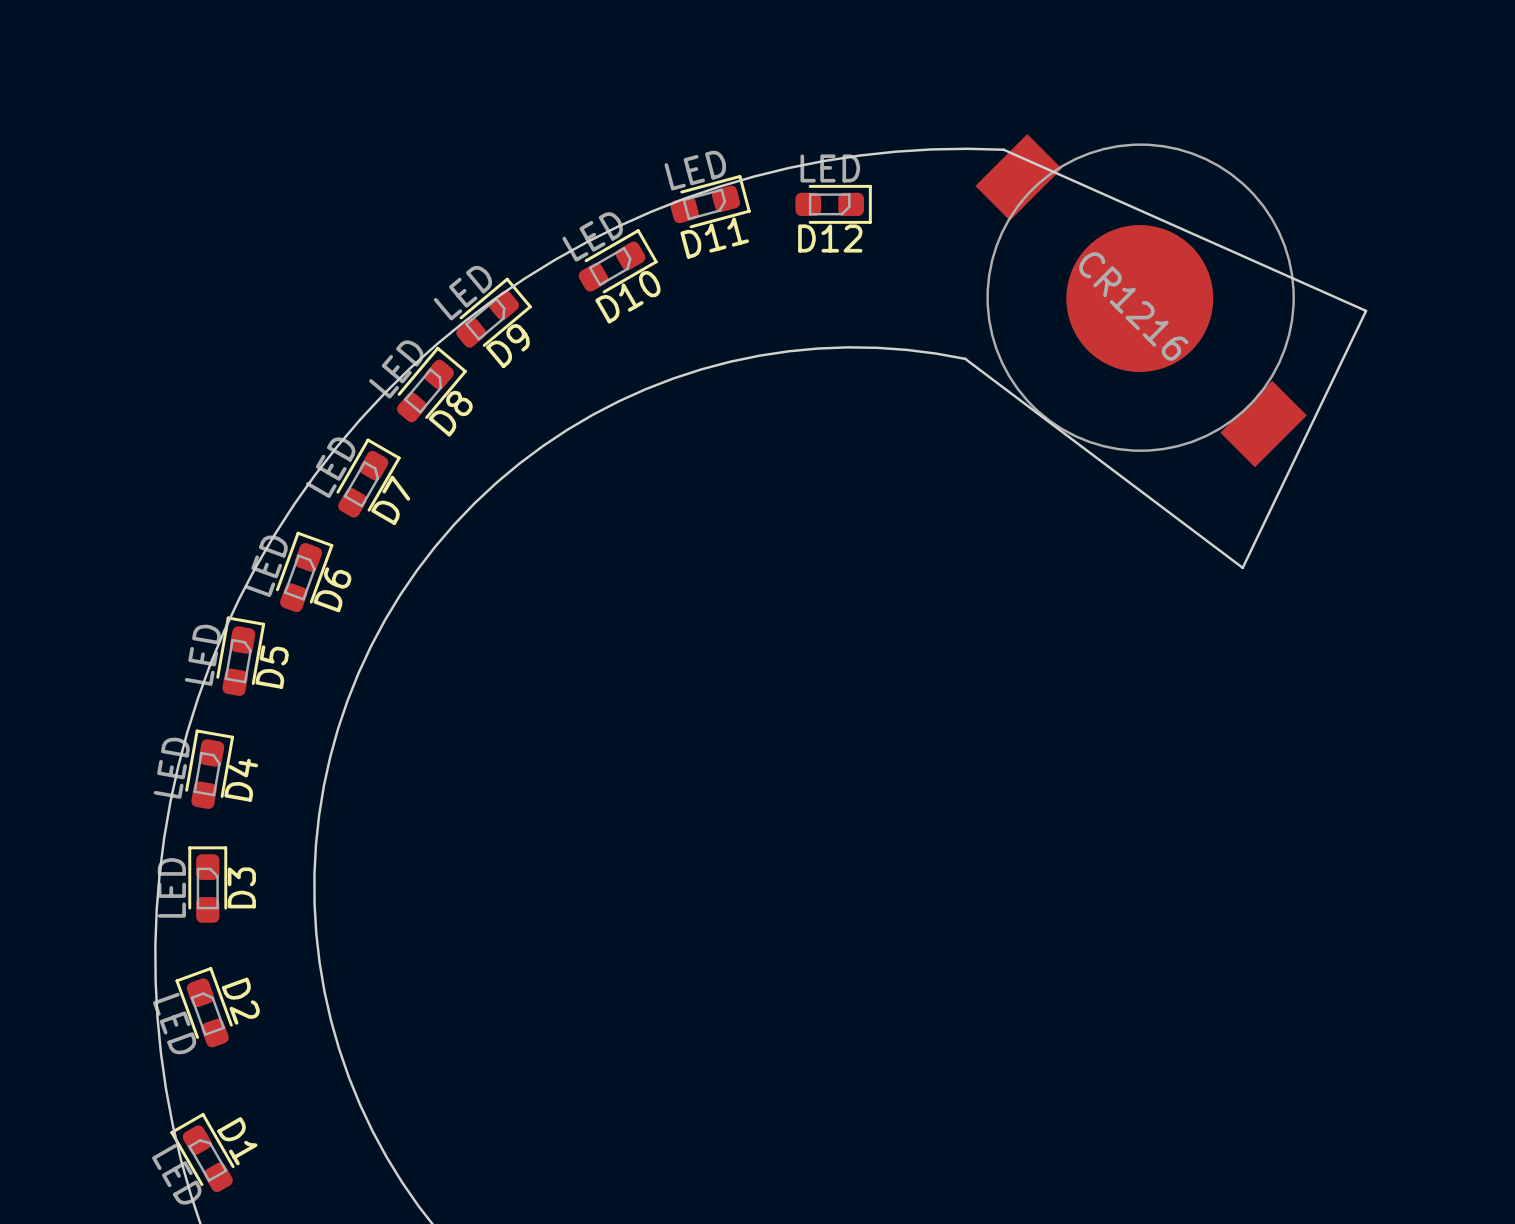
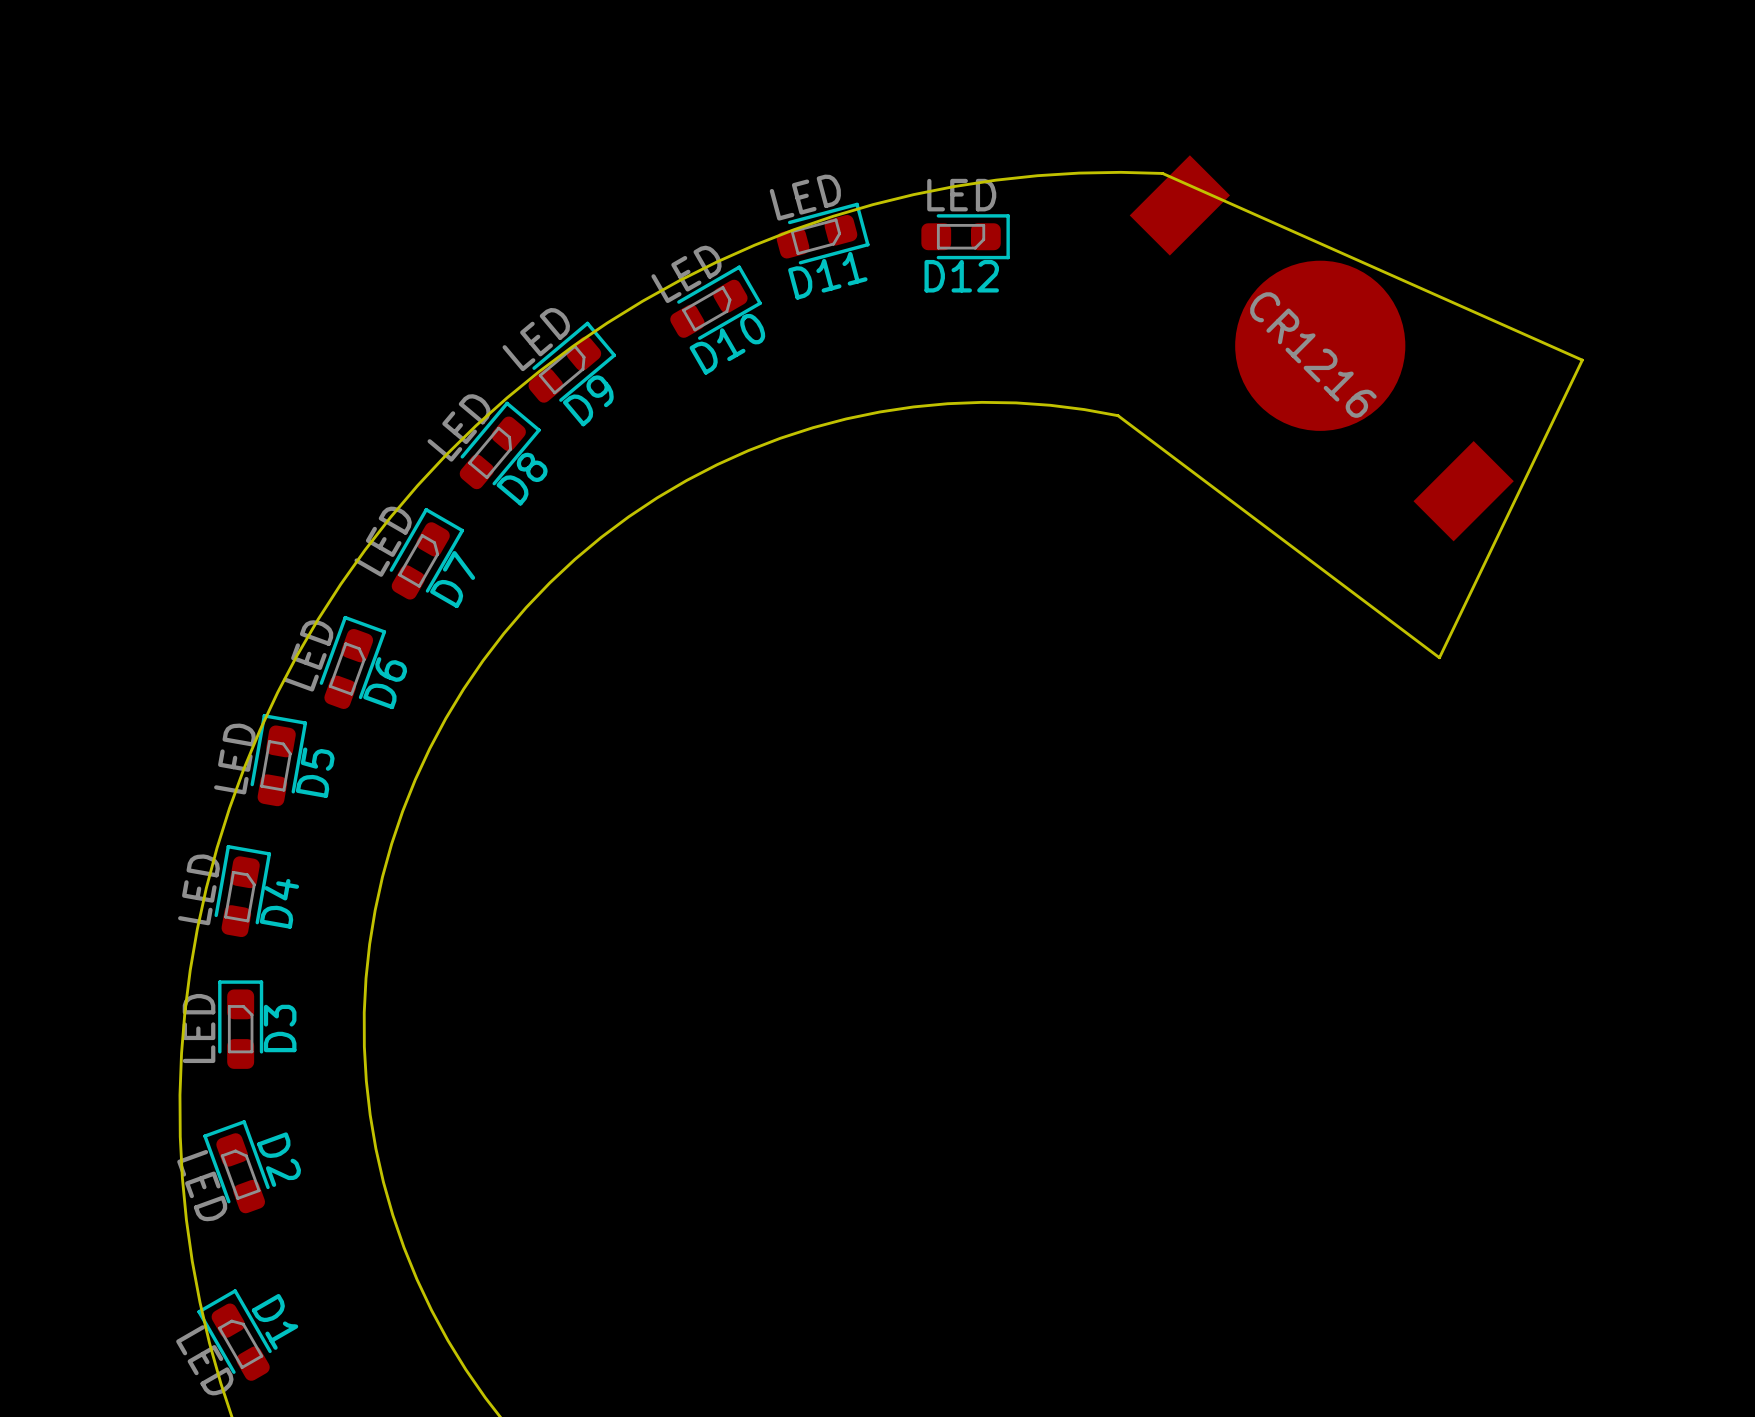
part footprint: [975, 134, 1307, 468] -> [1129, 155, 1514, 542]

